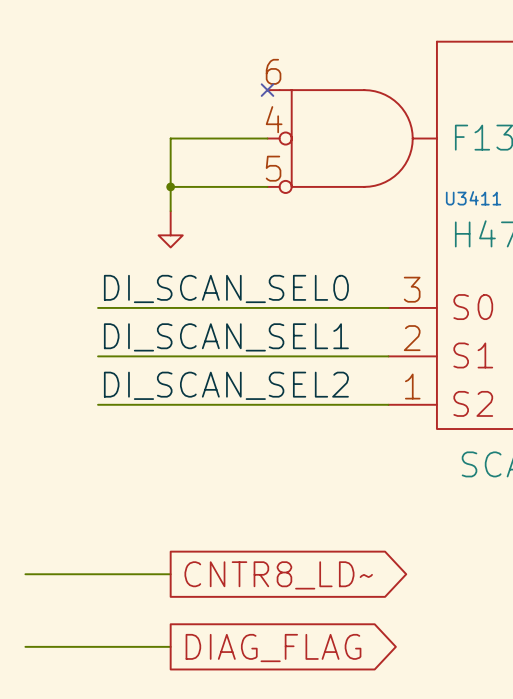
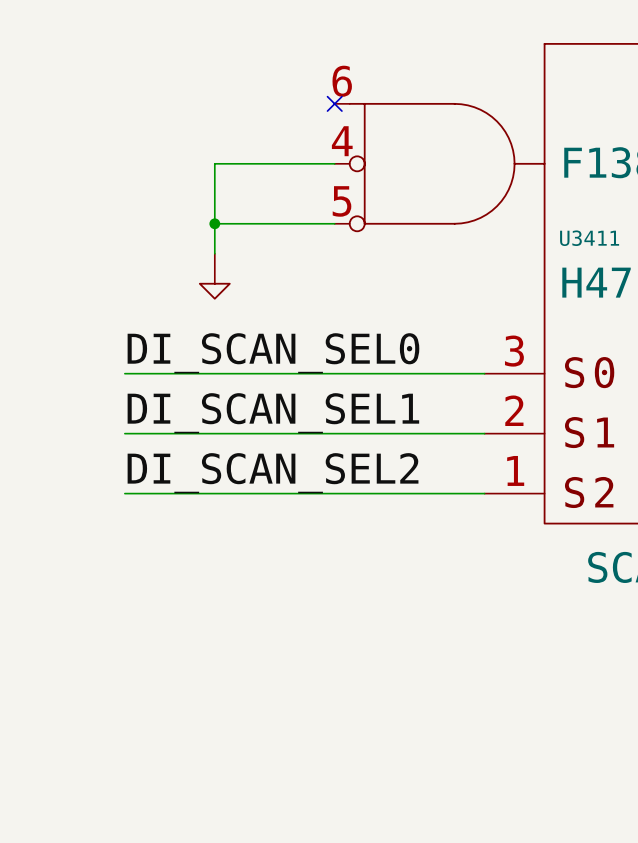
wire: (25, 574) (170, 574) -> none
global label: CNTR8_LD~ (278, 575) -> none
wire: (25, 646) (170, 646) -> none
global label: DIAG_FLAG (273, 648) -> none

